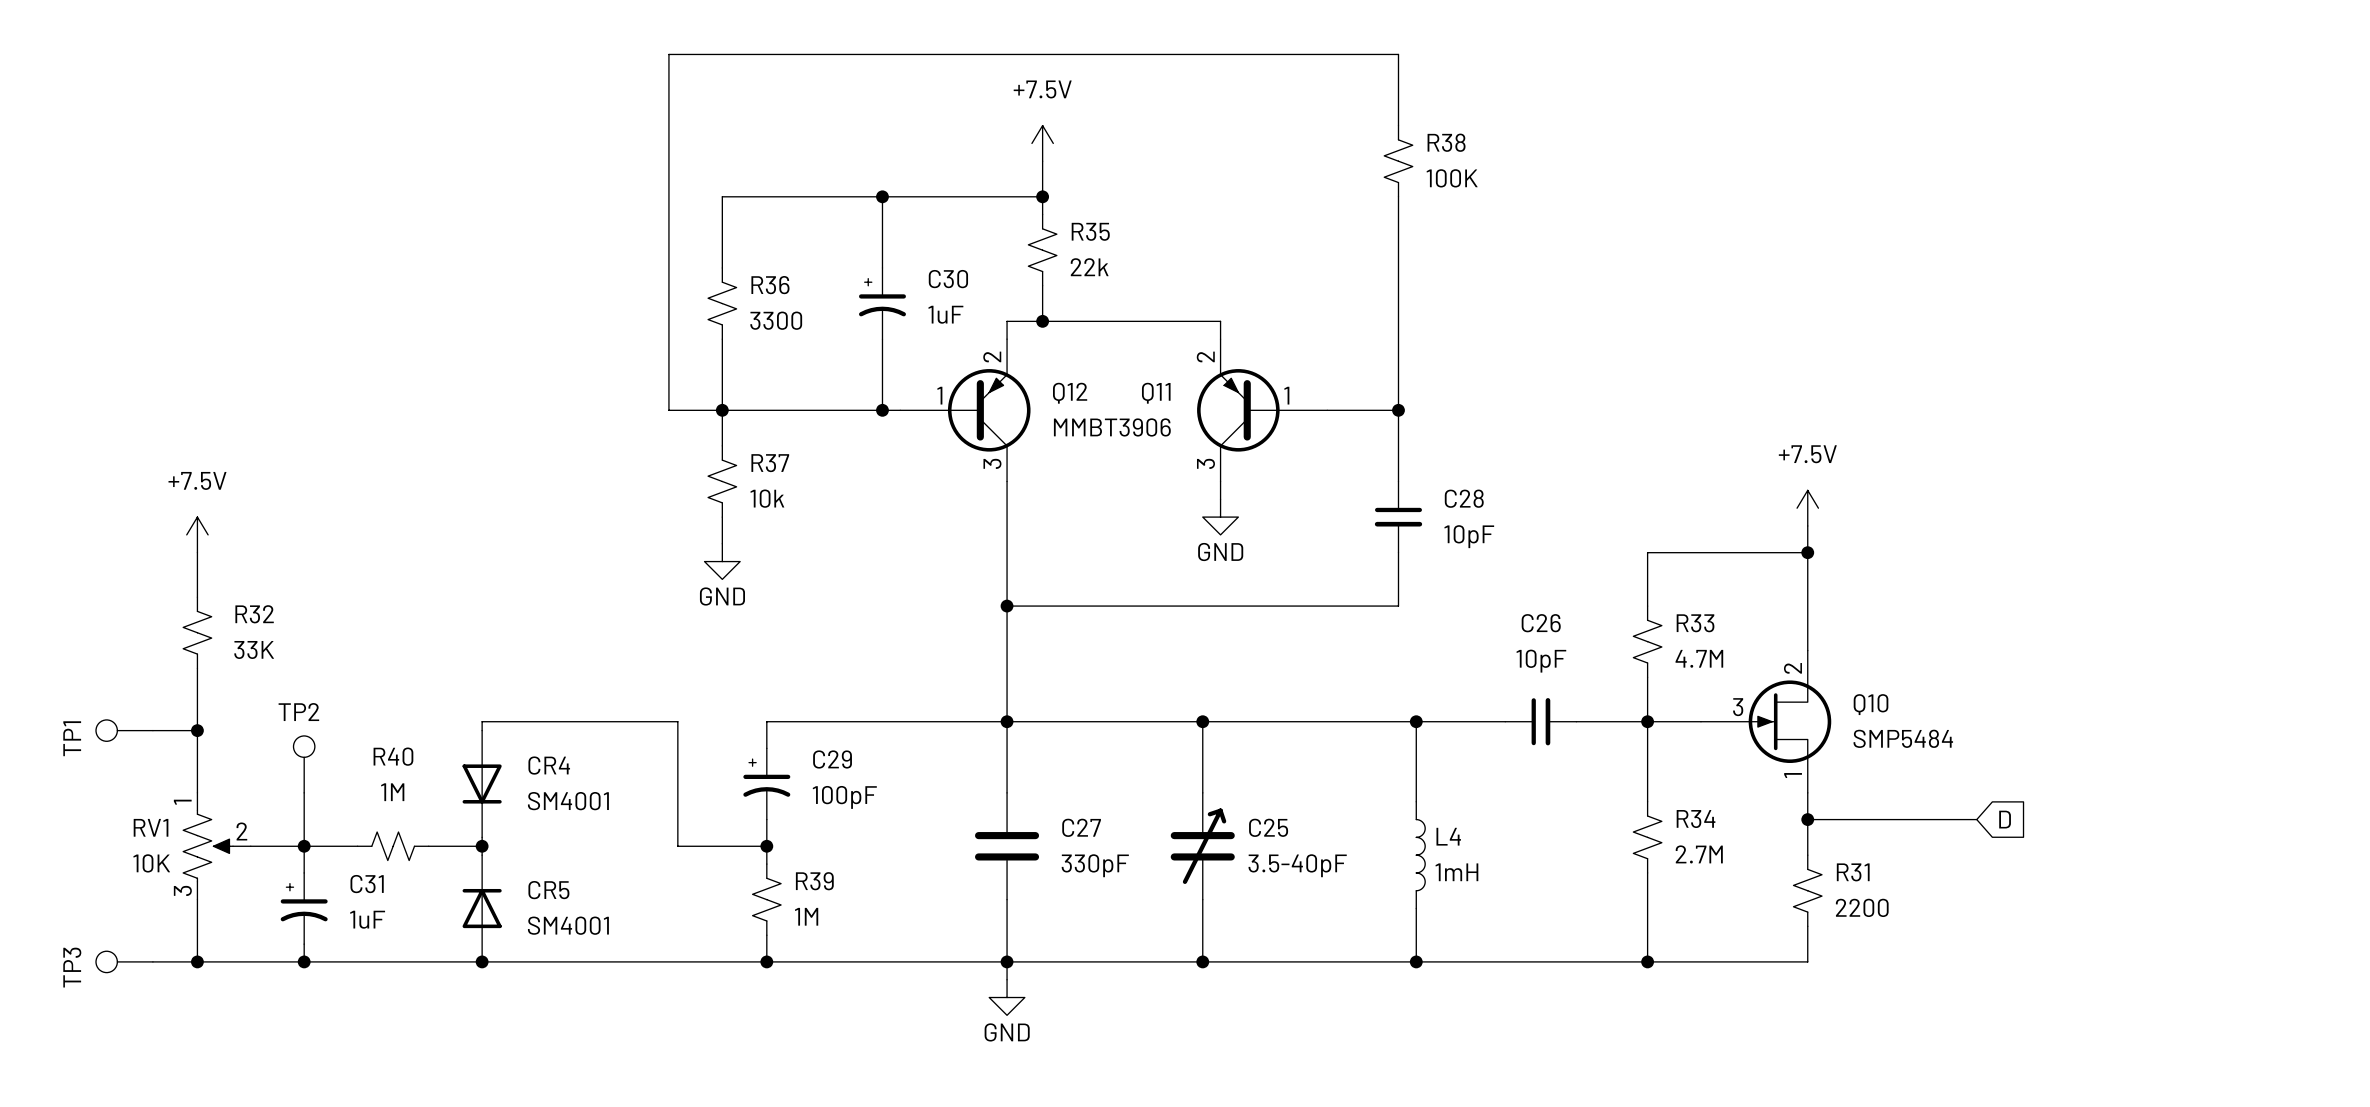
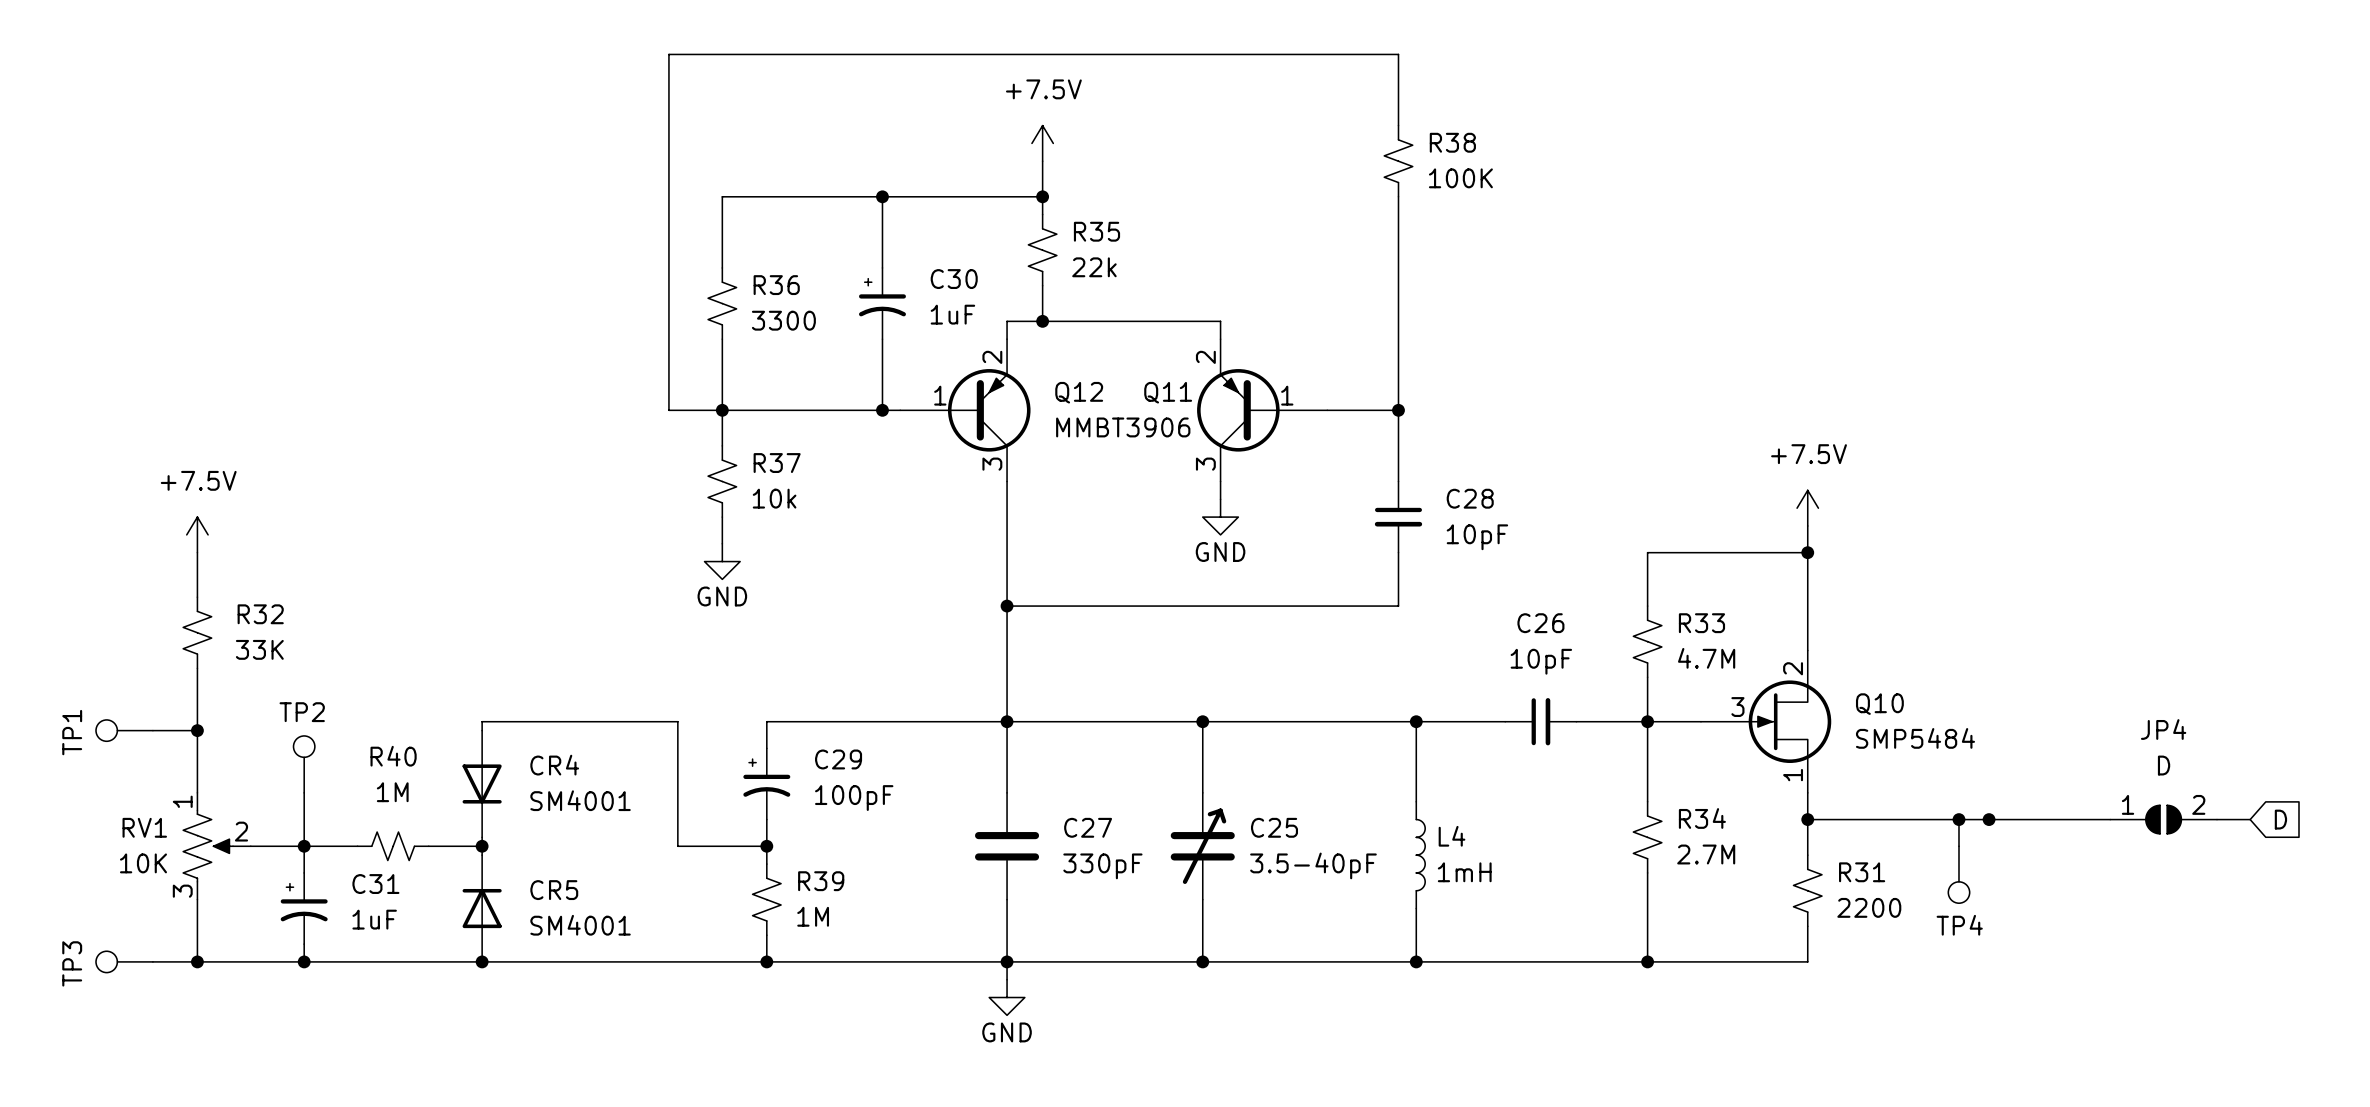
wire: none -> (1958, 819) (1958, 846)
junction: none -> (1958, 819)
wire: none -> (1976, 819) (2110, 819)
junction: none -> (1989, 819)
global label position: D (2005, 819) -> D (2280, 819)
JP4: none -> D (2163, 819)
wire: none -> (2217, 819) (2250, 819)
TP4: none -> (1958, 874)

